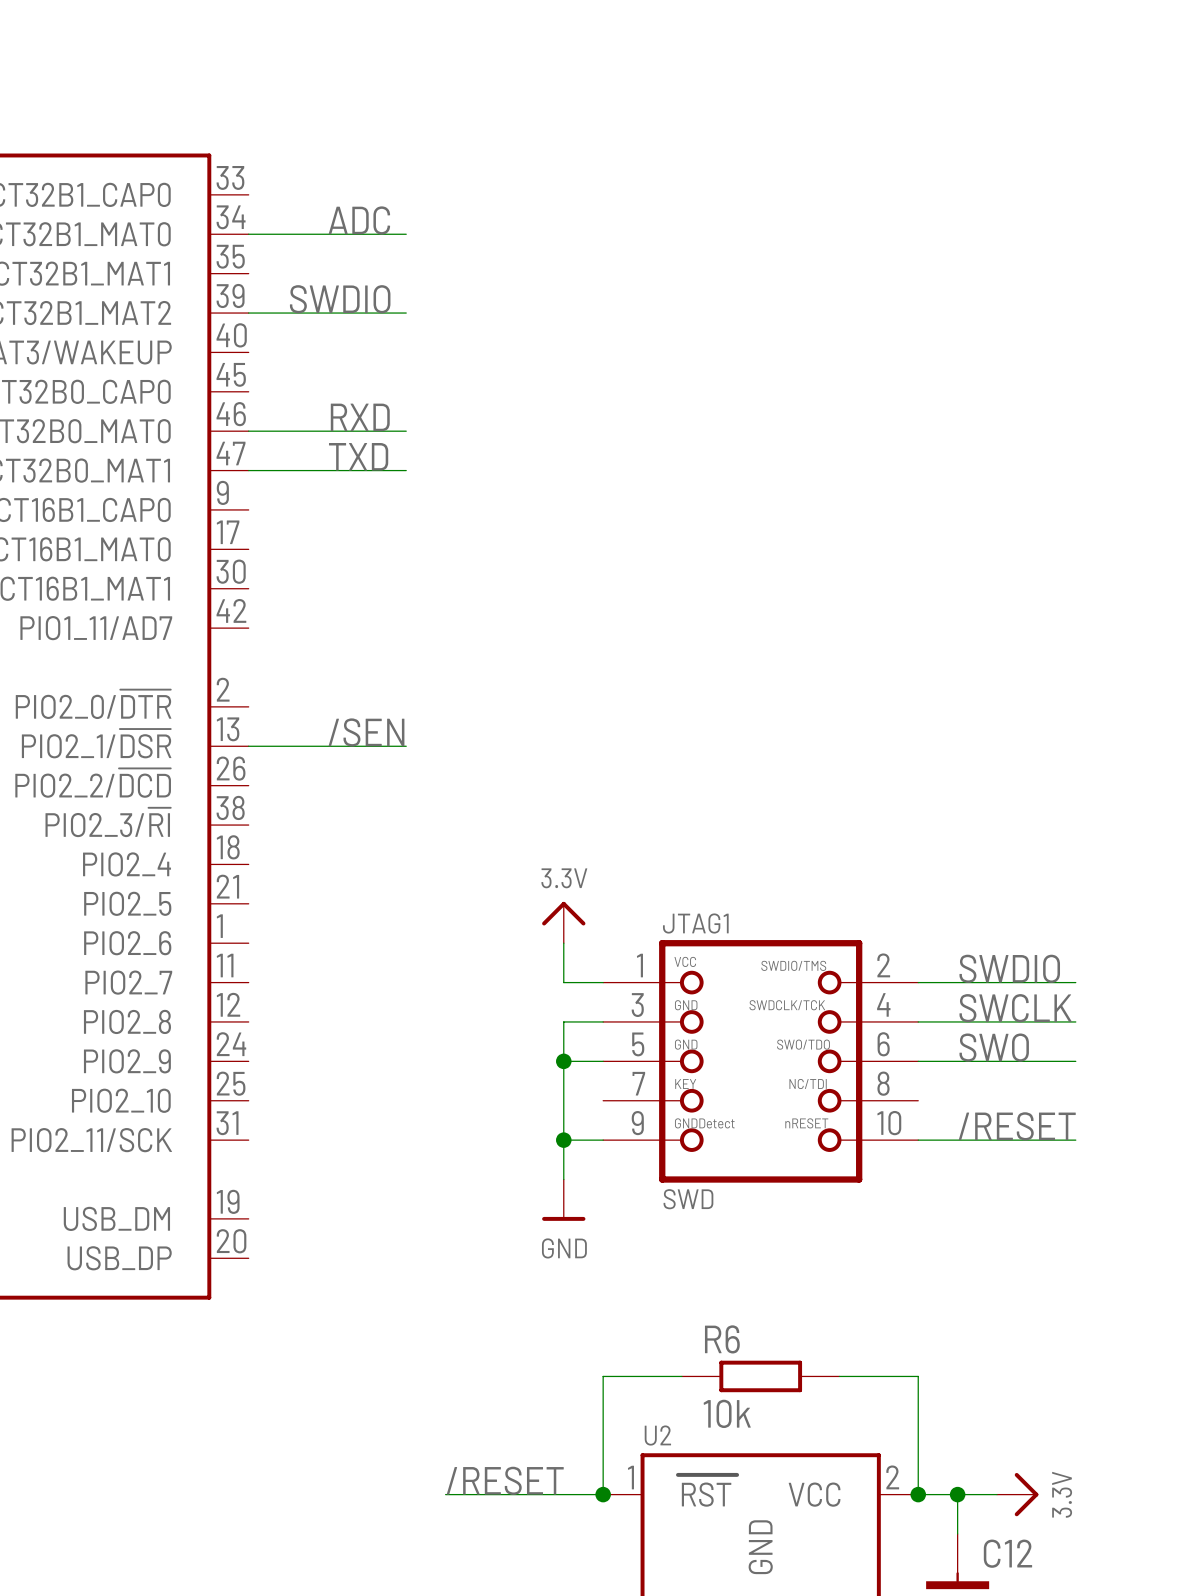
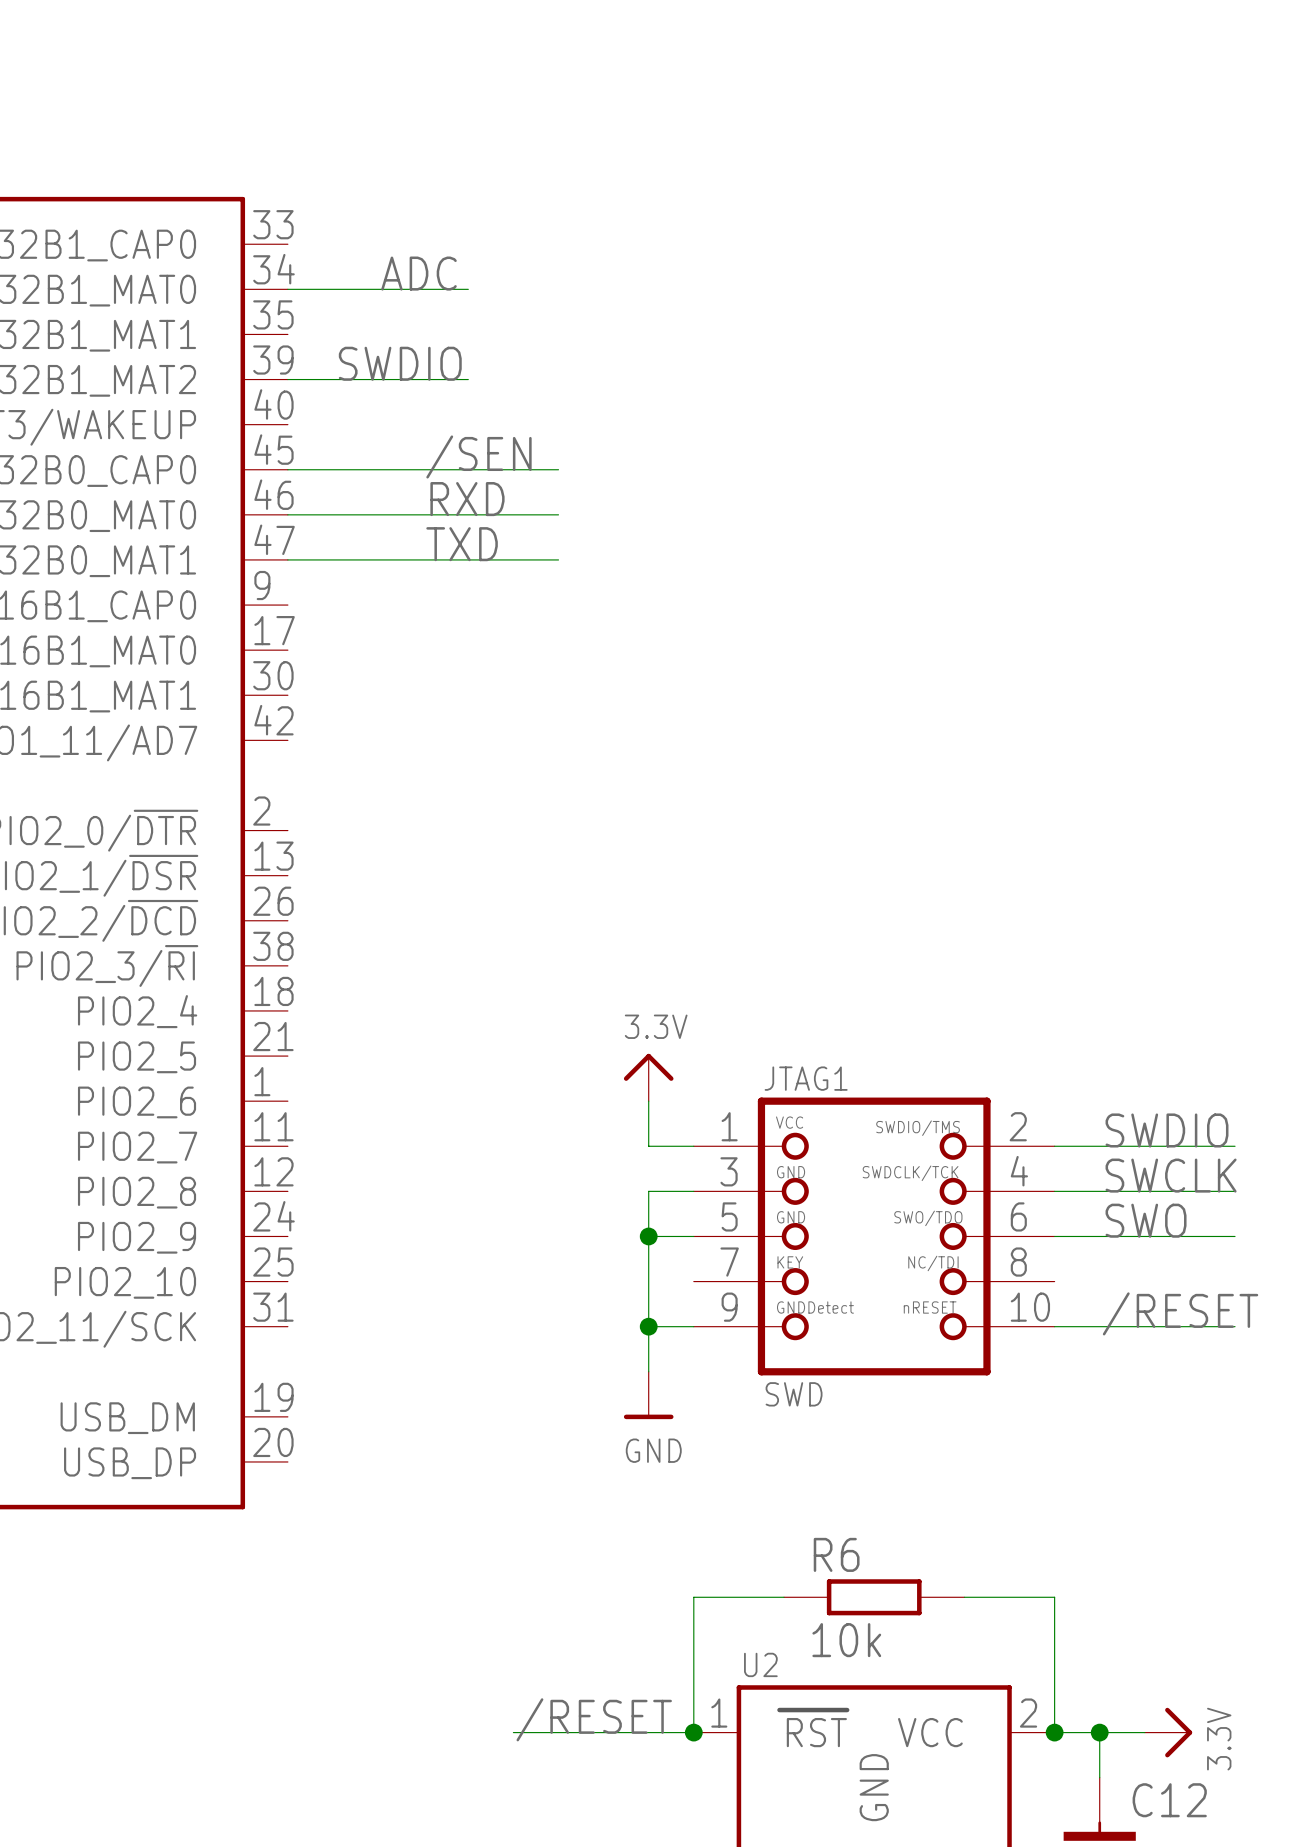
wire: none -> (287, 469) (558, 469)
label position: RXD (360, 417) -> RXD (467, 499)
wire: none -> (468, 514) (558, 514)
label position: TXD (358, 456) -> TXD (462, 544)
wire: none -> (468, 559) (558, 559)
label position: /SEN (366, 732) -> /SEN (478, 456)
wire: (248, 746) (406, 746) -> none

